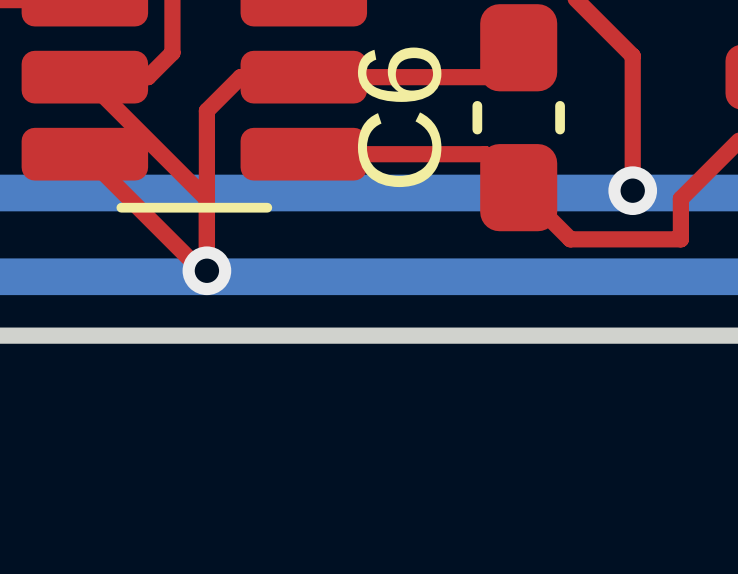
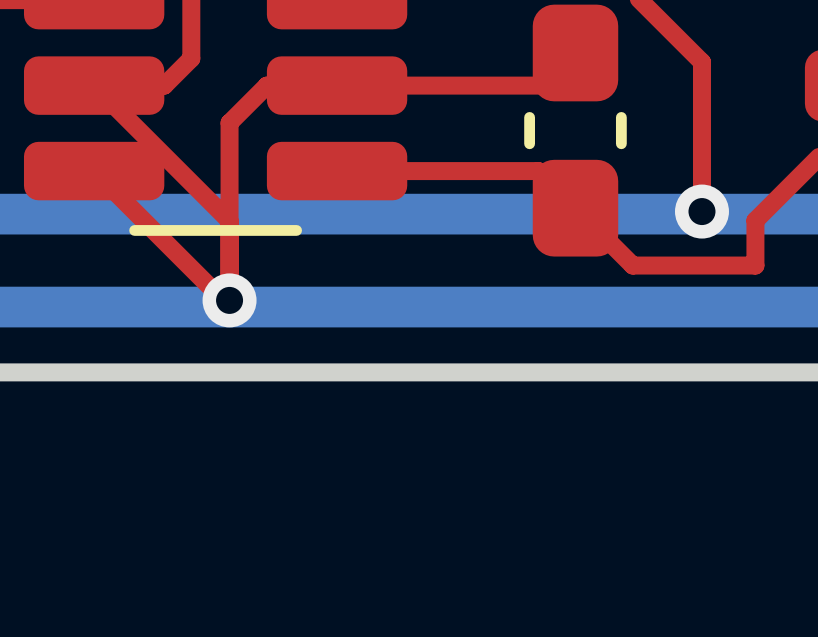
C6 name: C6 (399, 117) -> none

